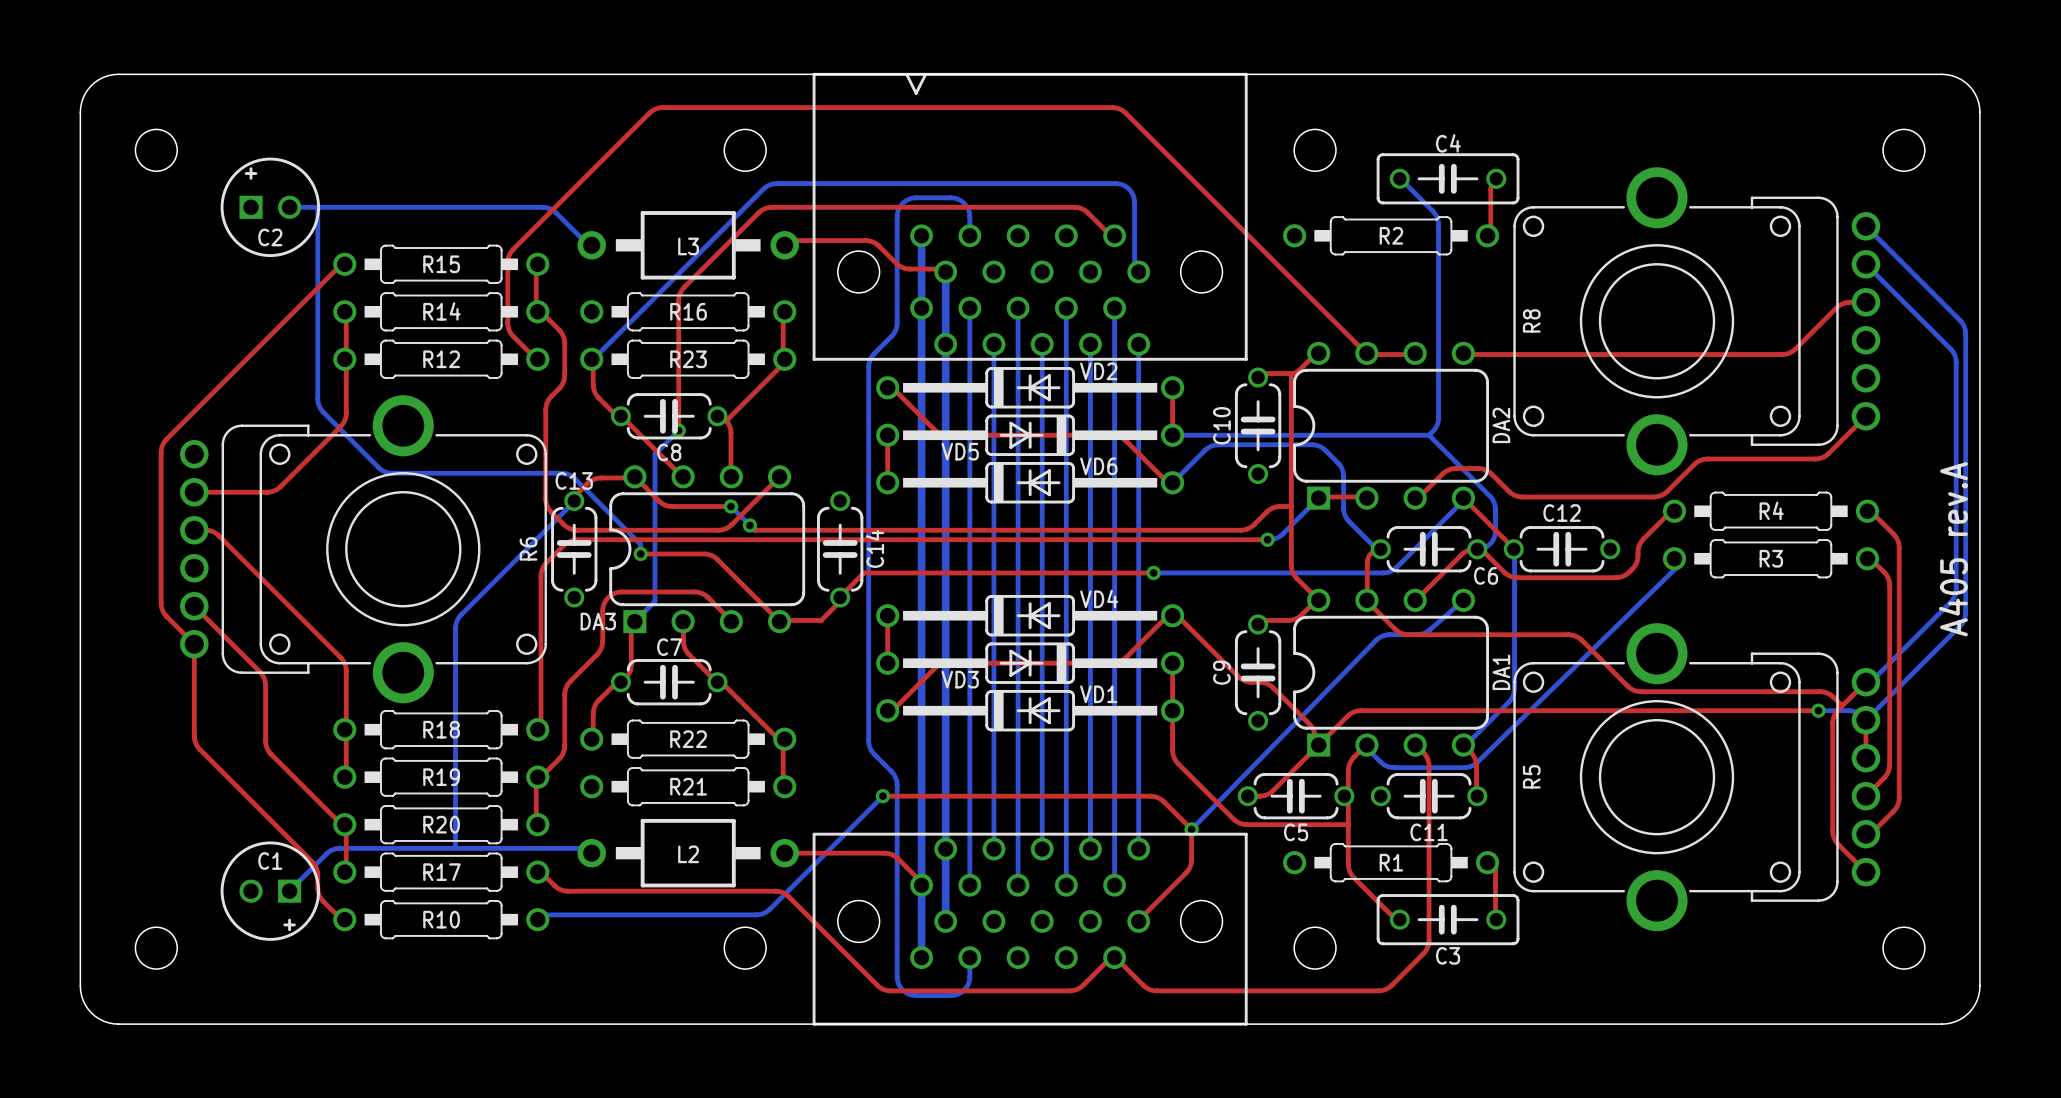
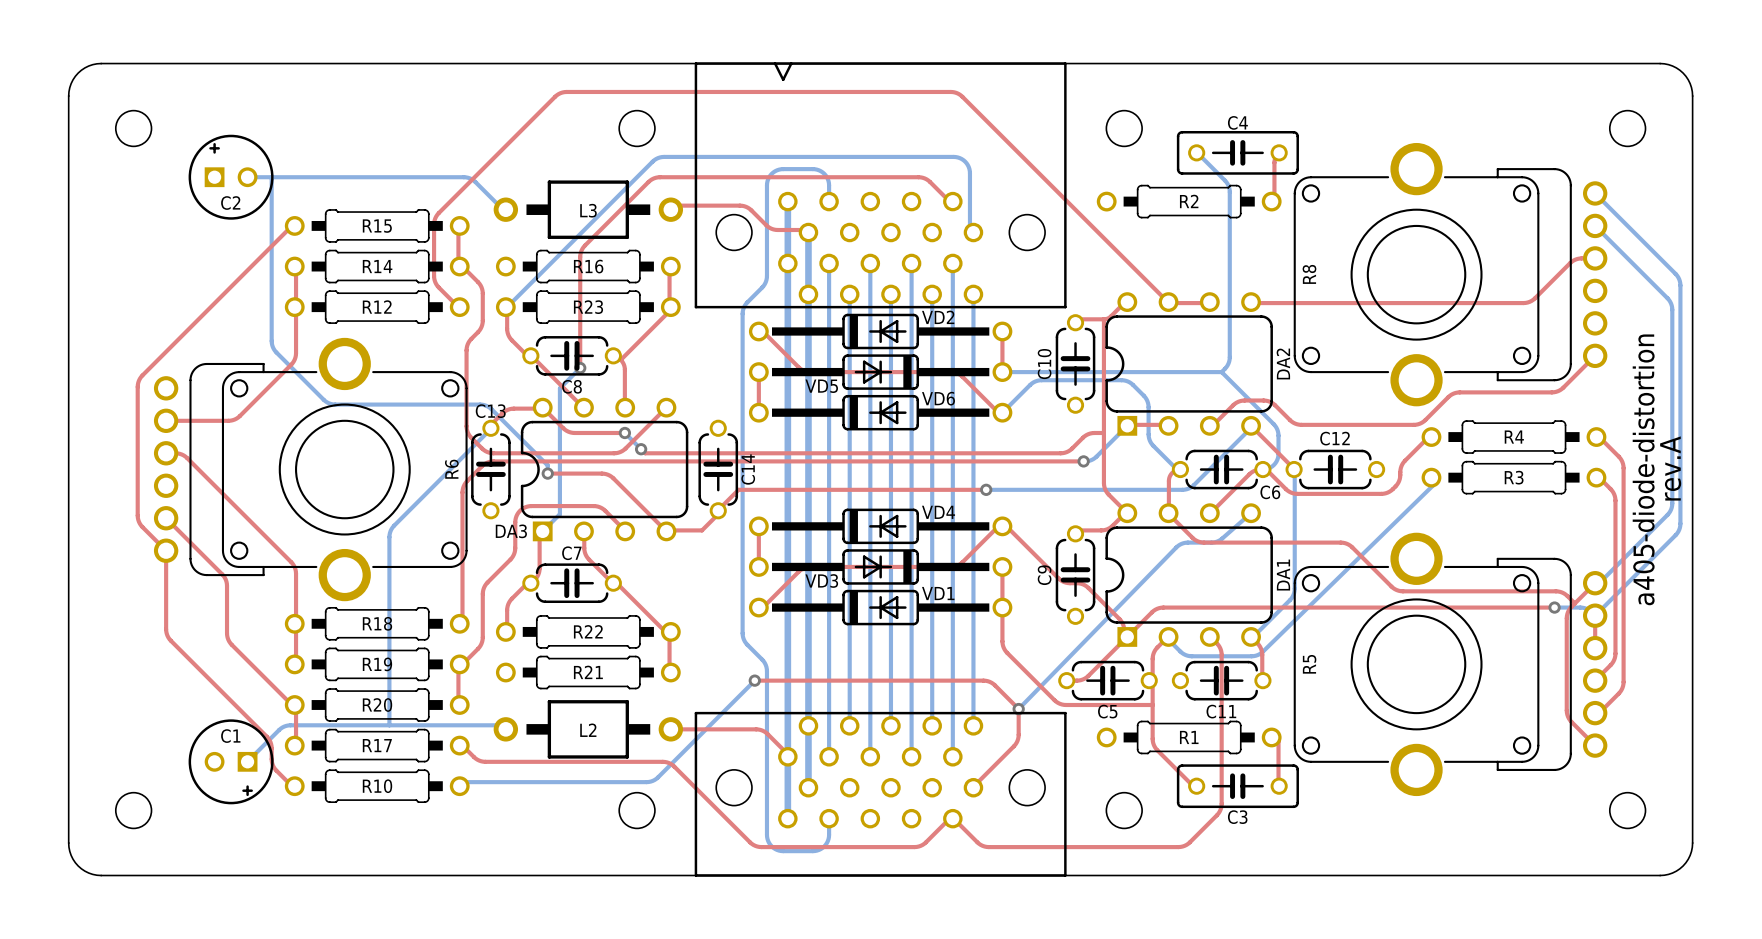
part text: none -> a405-diode-distortion (1643, 469)
part value: A405 rev.A (1953, 549) -> rev.A (1670, 468)

